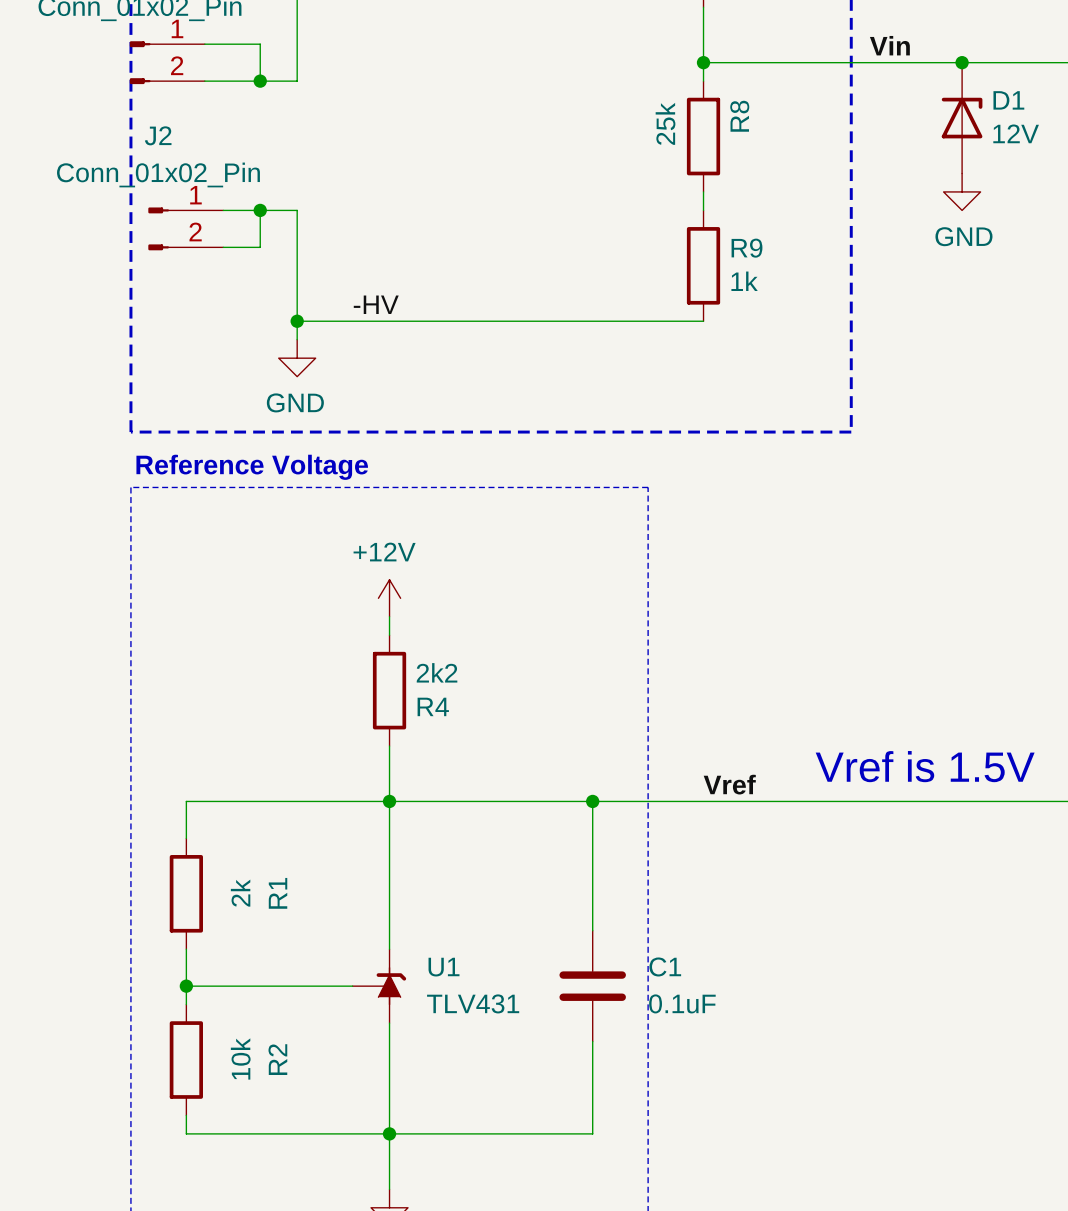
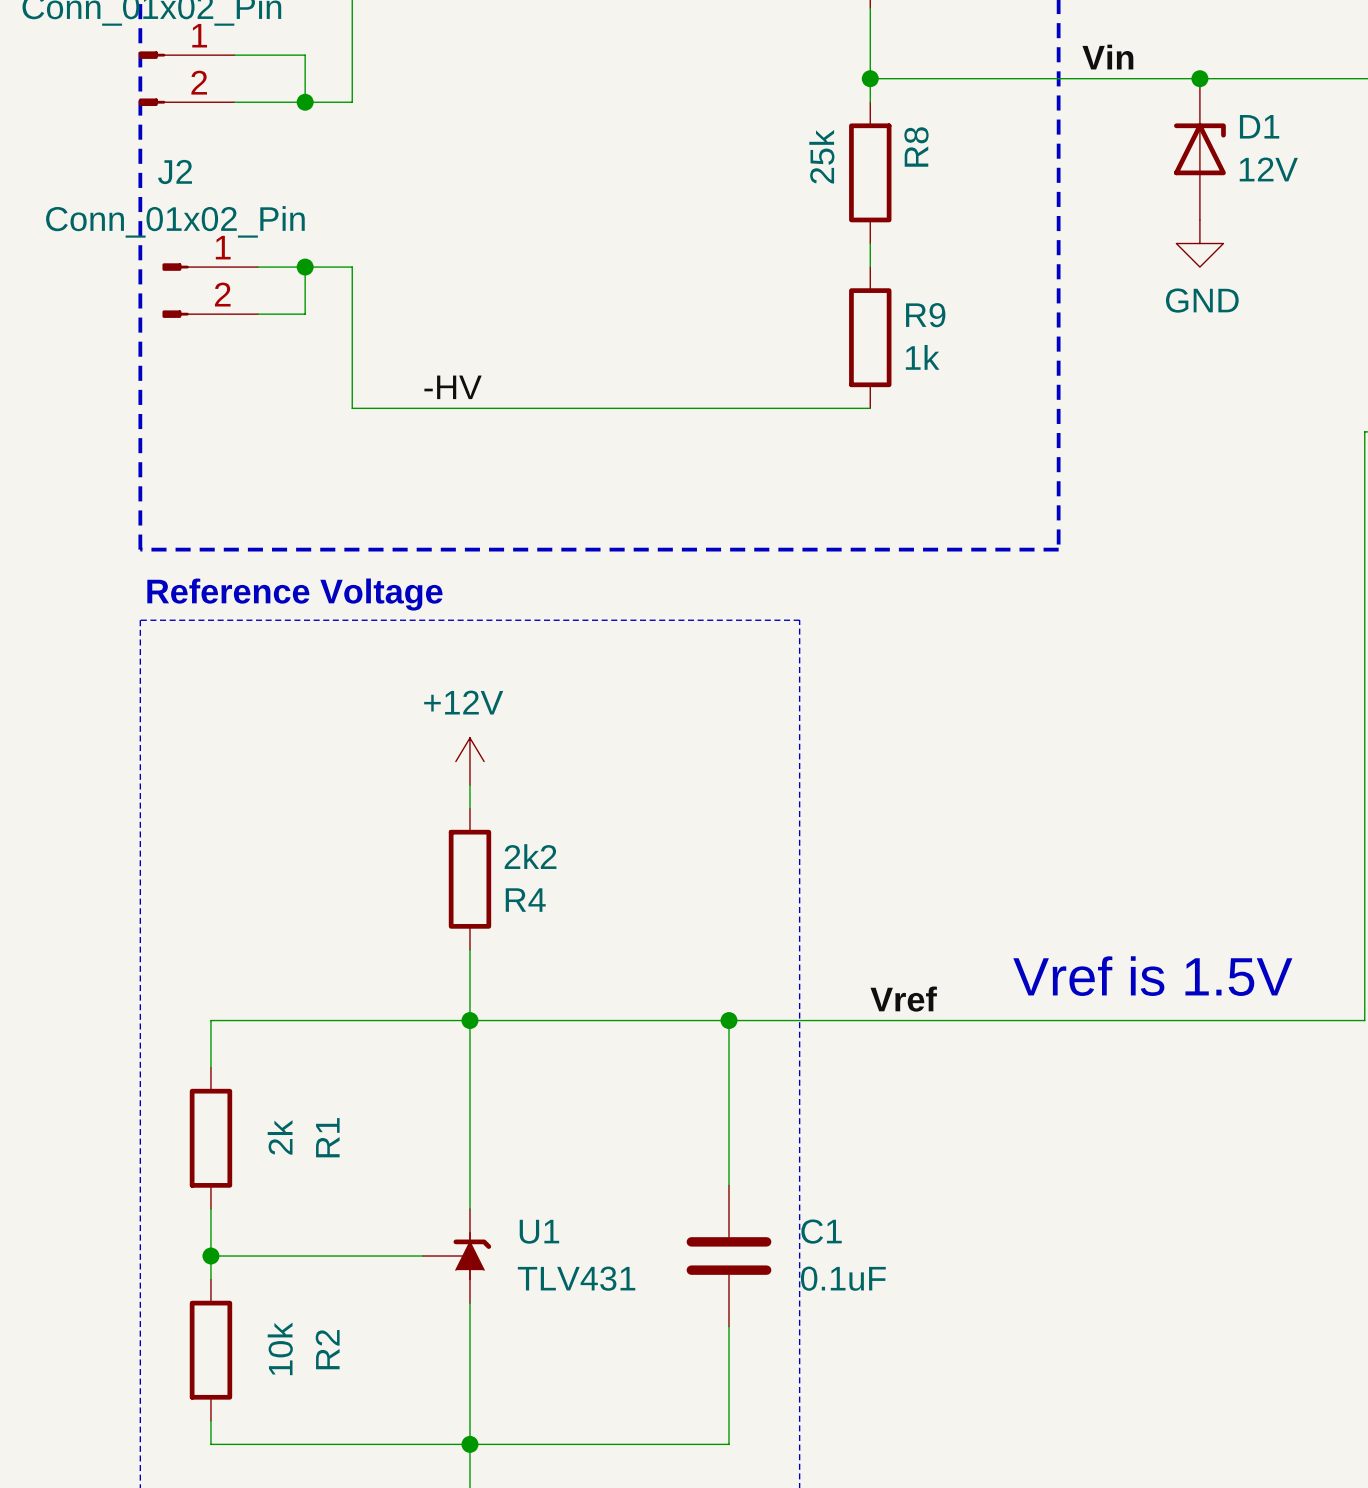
wire: (297, 321) (297, 339) -> none
junction: (297, 321) -> none
power symbol: GND (297, 358) -> none

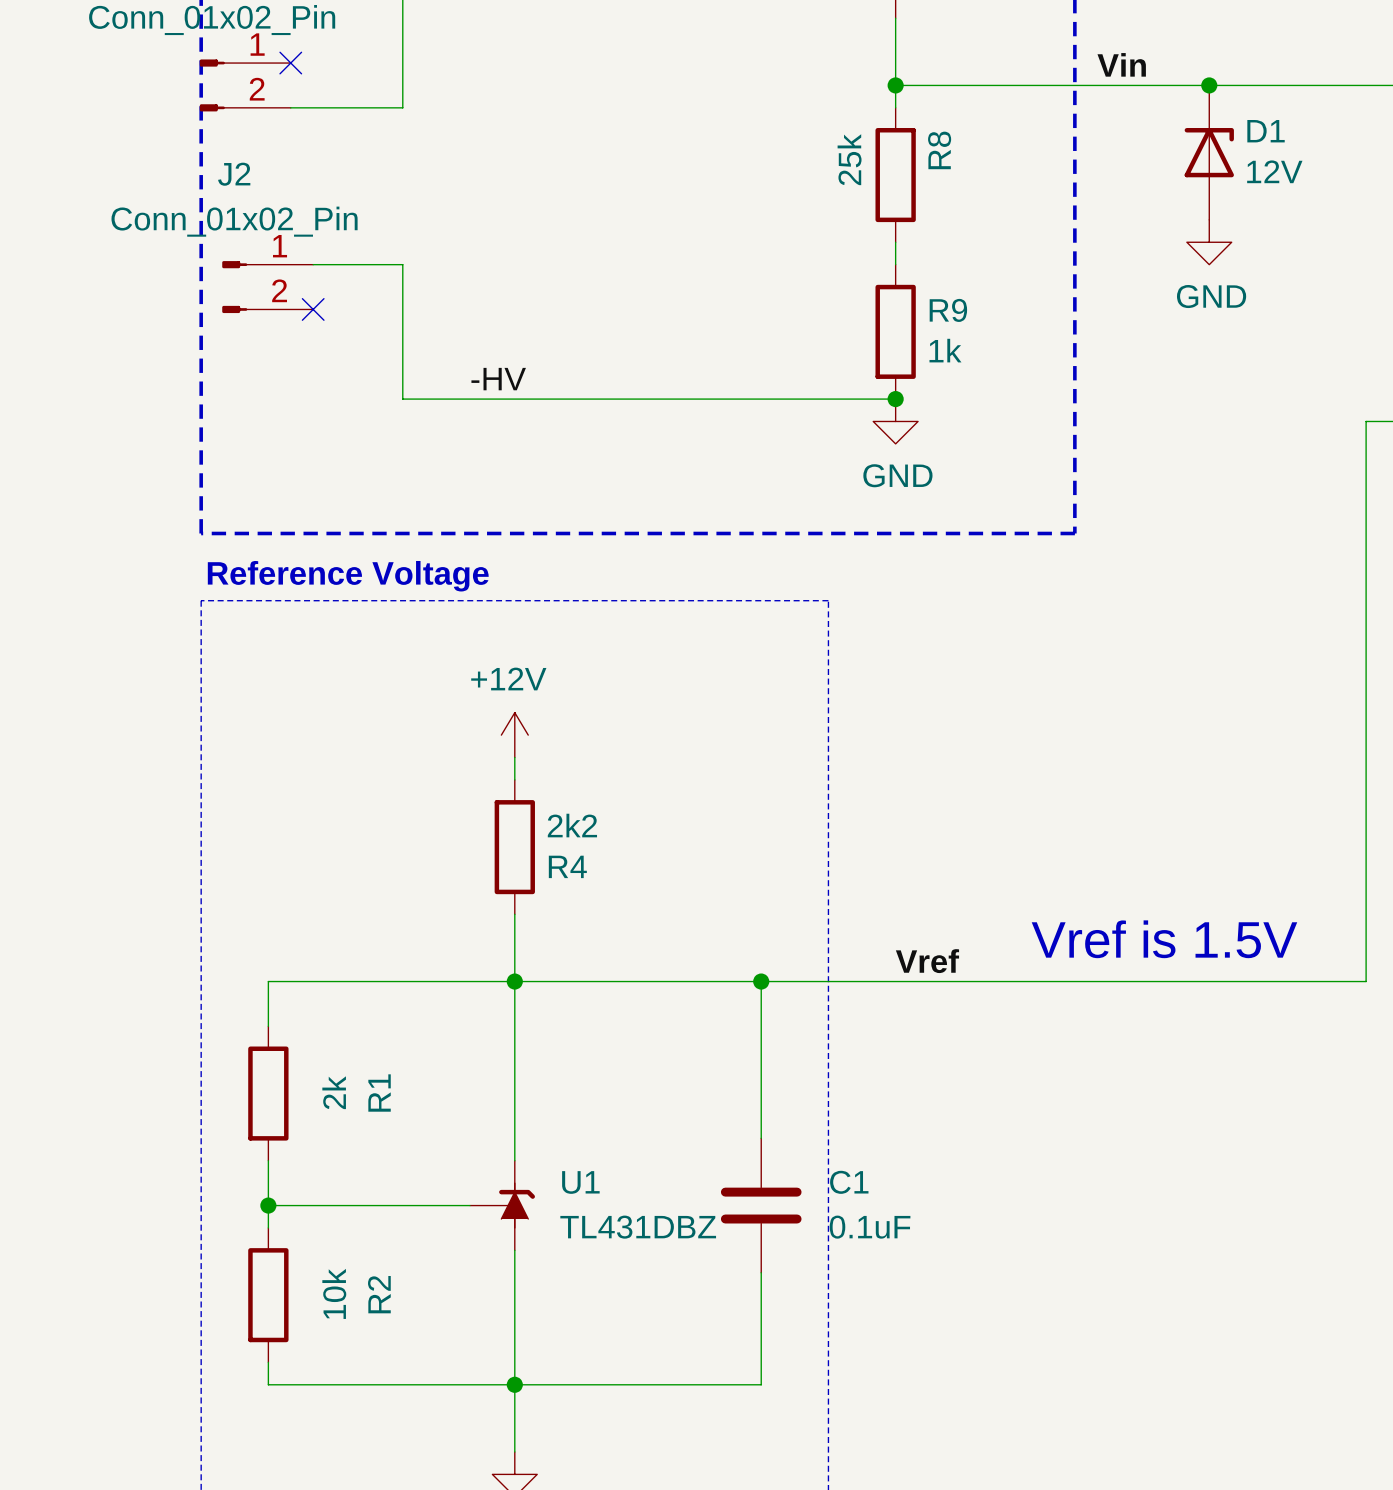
wire: (234, 55) (305, 55) (305, 102) -> none
no-connect mark: none -> (290, 63)
junction: (305, 102) -> none
wire: (305, 267) (305, 314) (258, 314) -> none
junction: (305, 267) -> none
no-connect mark: none -> (313, 309)
junction: none -> (895, 399)
power symbol: none -> GND (895, 421)
U1 value: TLV431 (576, 1278) -> TL431DBZ (638, 1227)

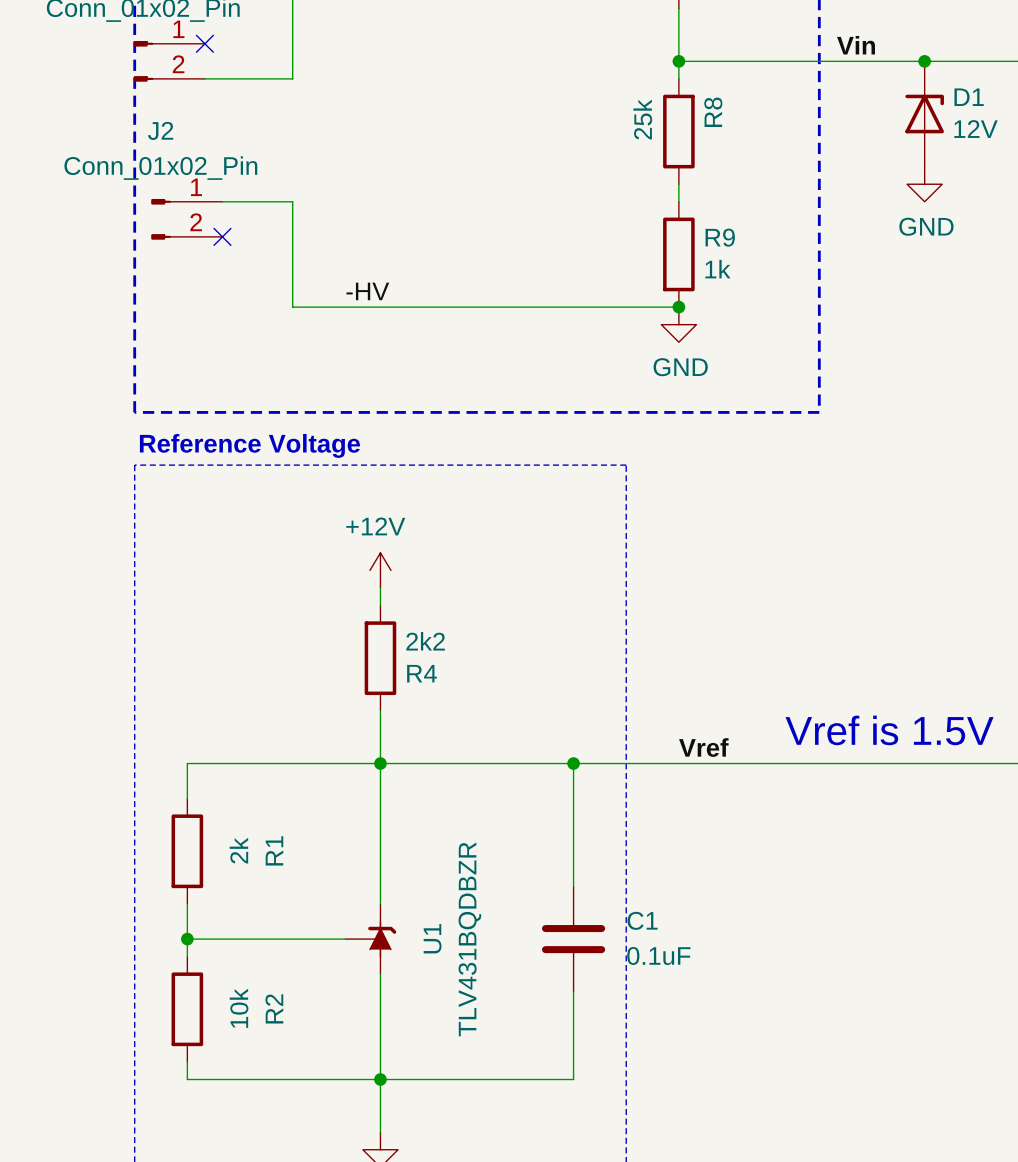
U1 name rotation: 0° (580, 1182) -> 90° counterclockwise (432, 938)
U1 value: TL431DBZ (638, 1227) -> TLV431BQDBZR (469, 939)

